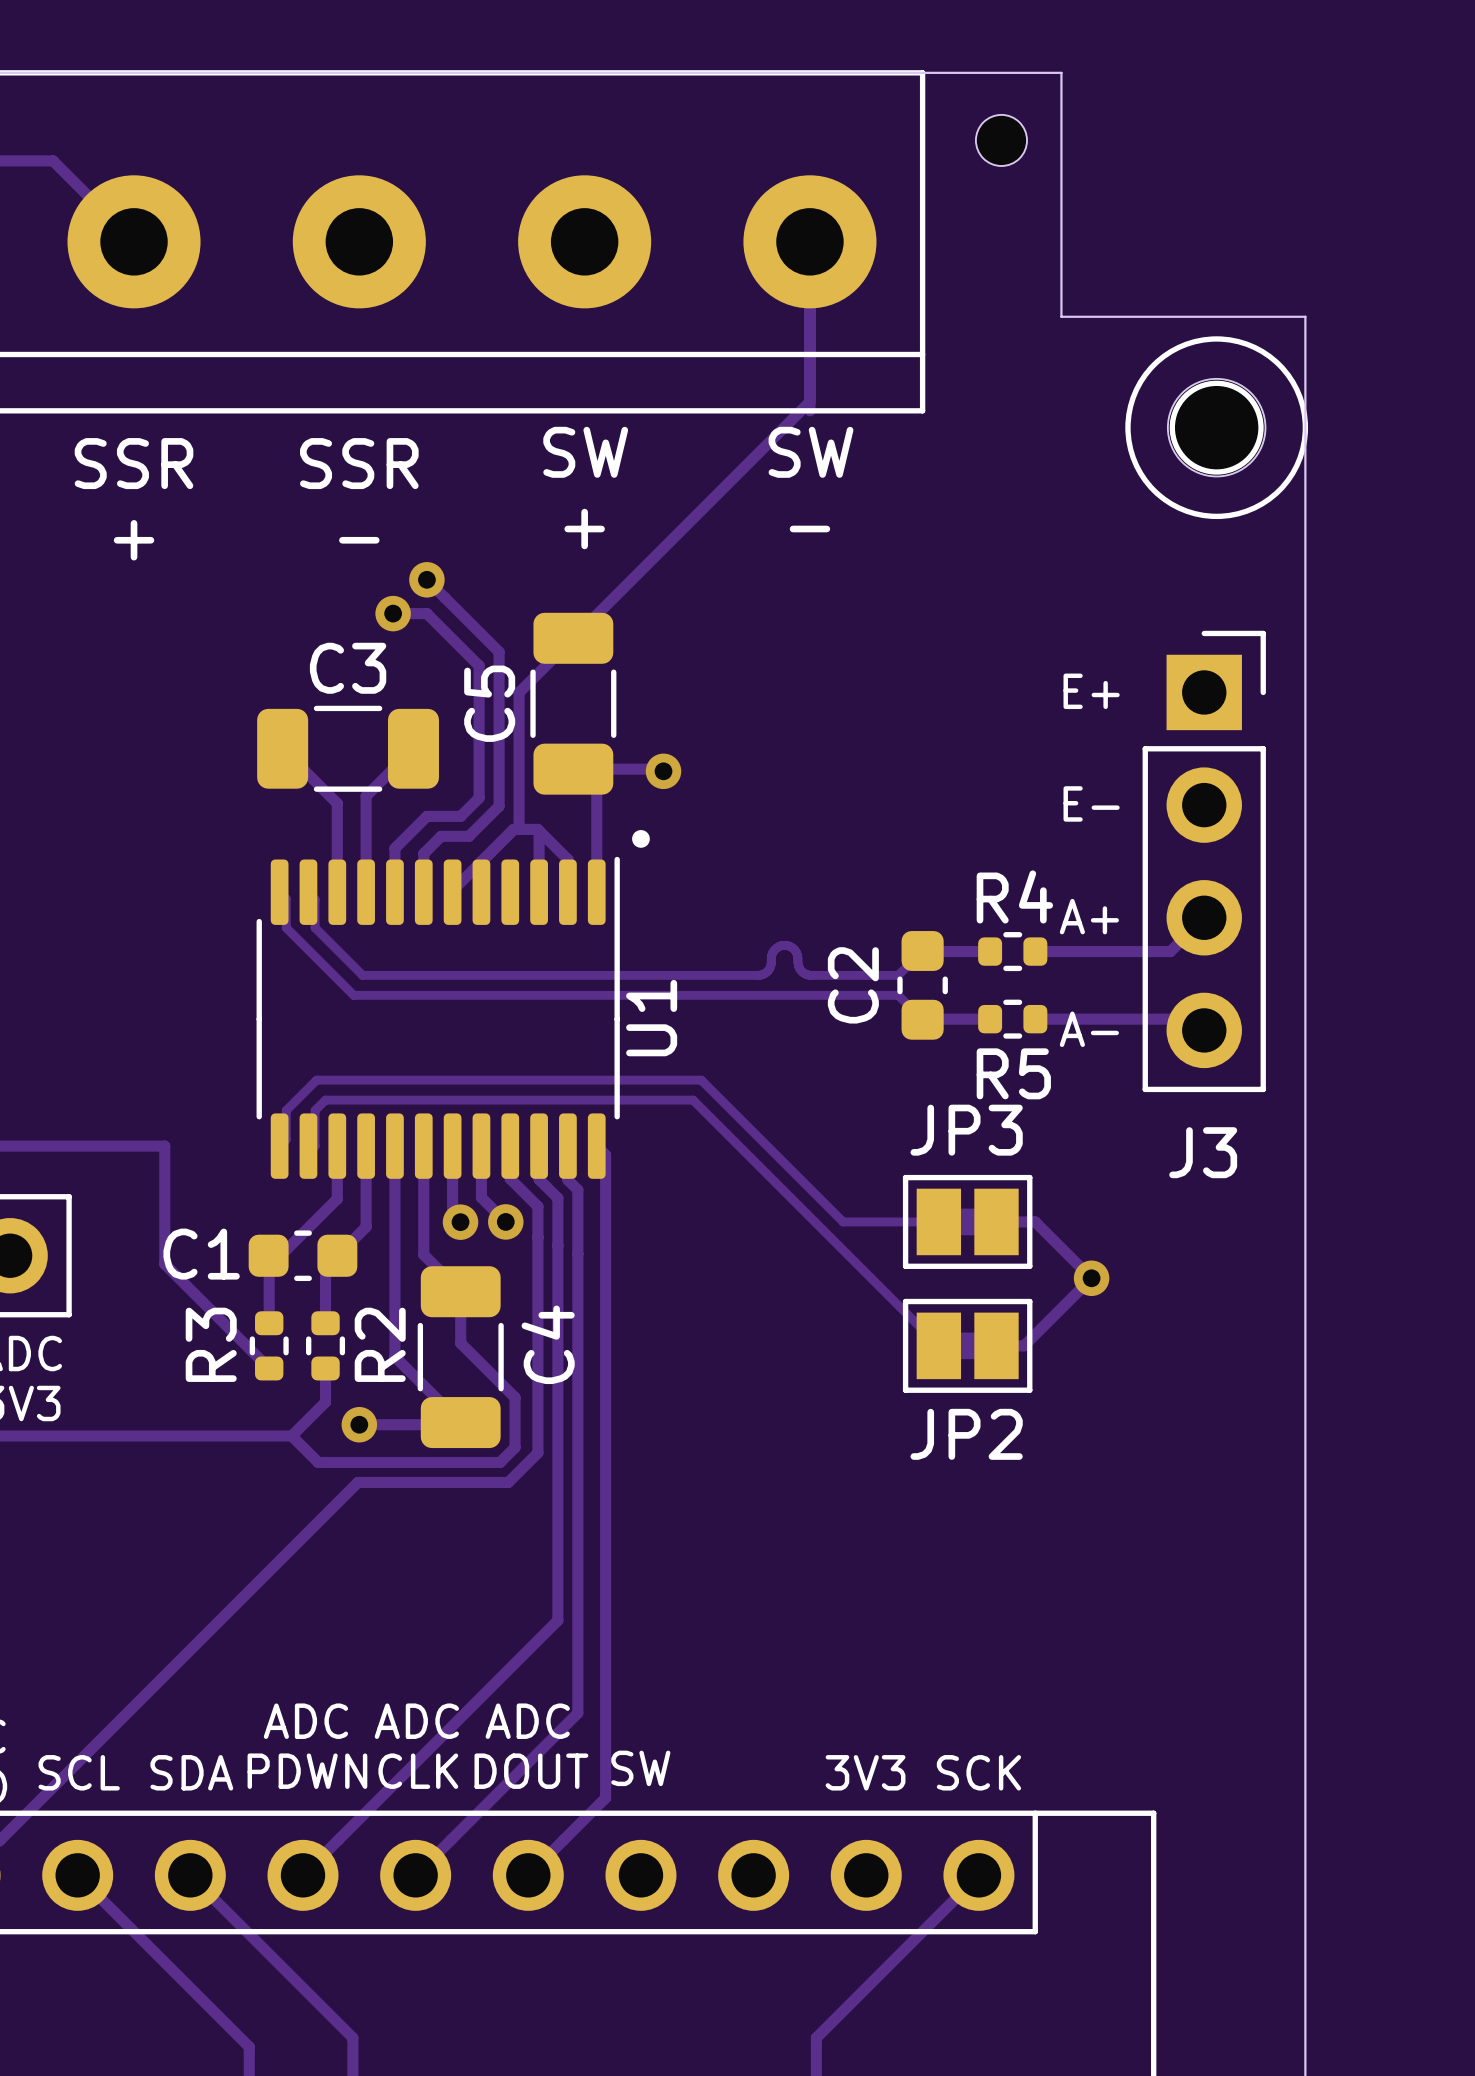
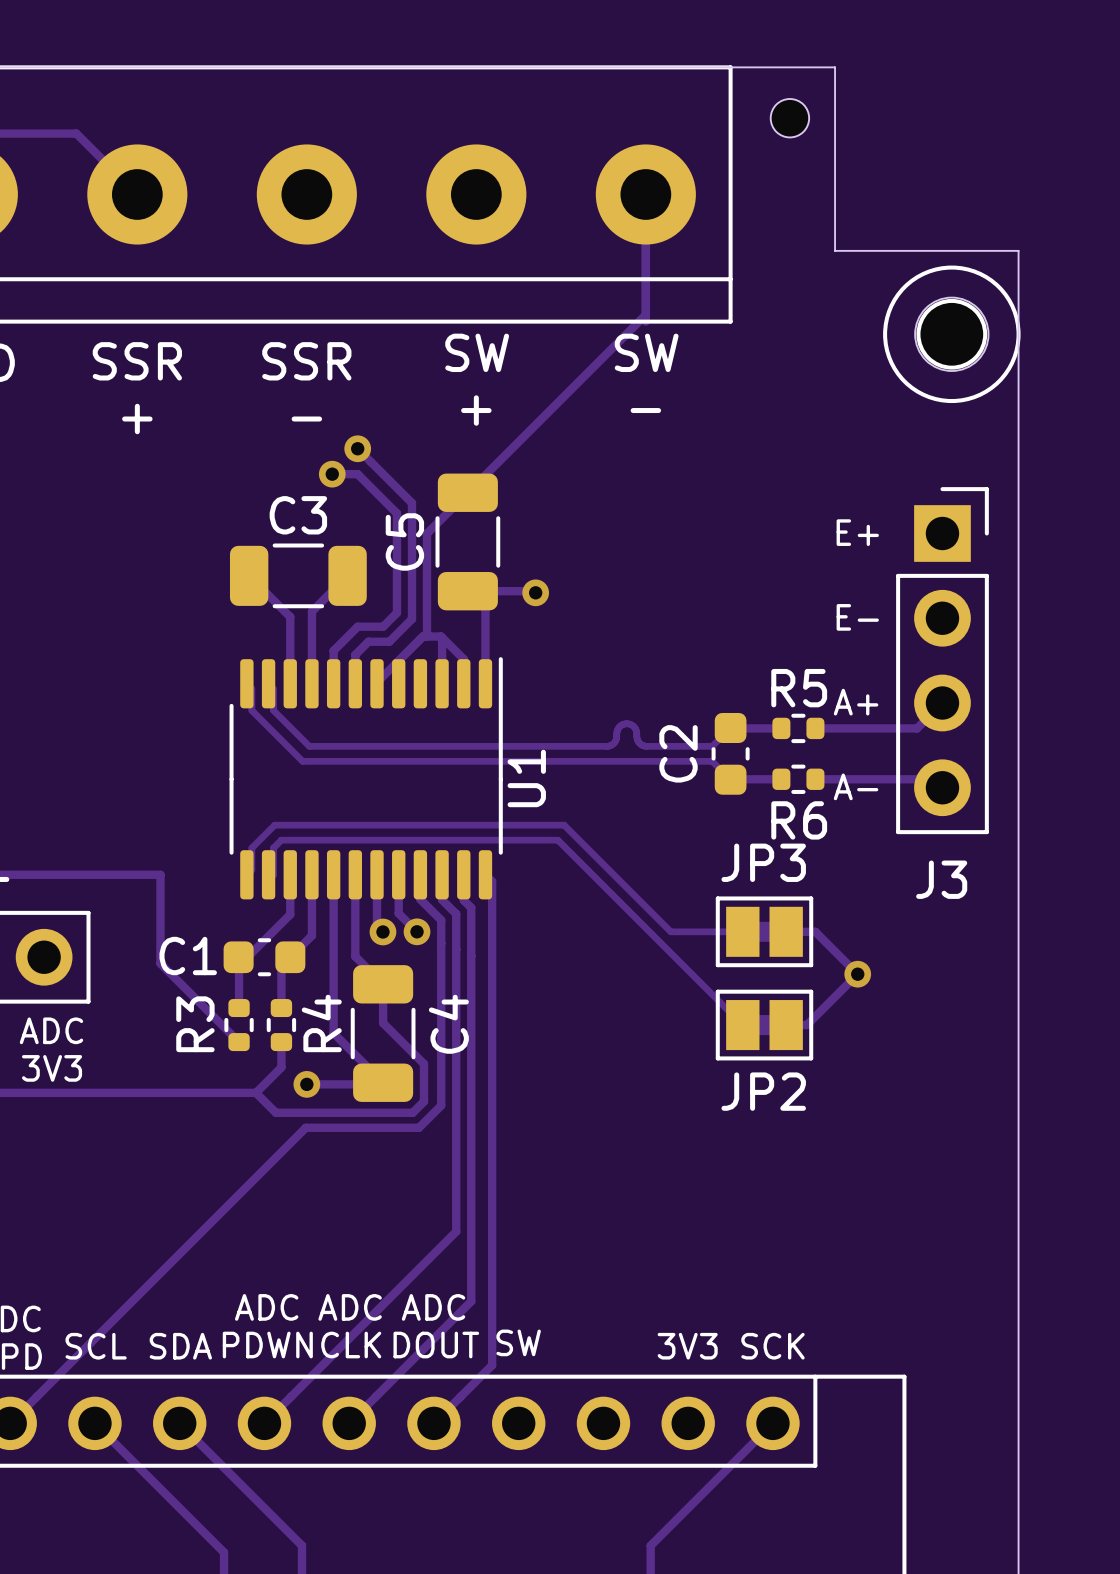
drawing: [632, 830, 650, 848] -> none
R4 name: R4 (1014, 896) -> R5 (799, 688)
R5 name: R5 (1013, 1073) -> R6 (799, 820)
R3 name: R3 (211, 1344) -> R4 (321, 1023)
R2 name: R2 (380, 1344) -> R3 (195, 1024)

